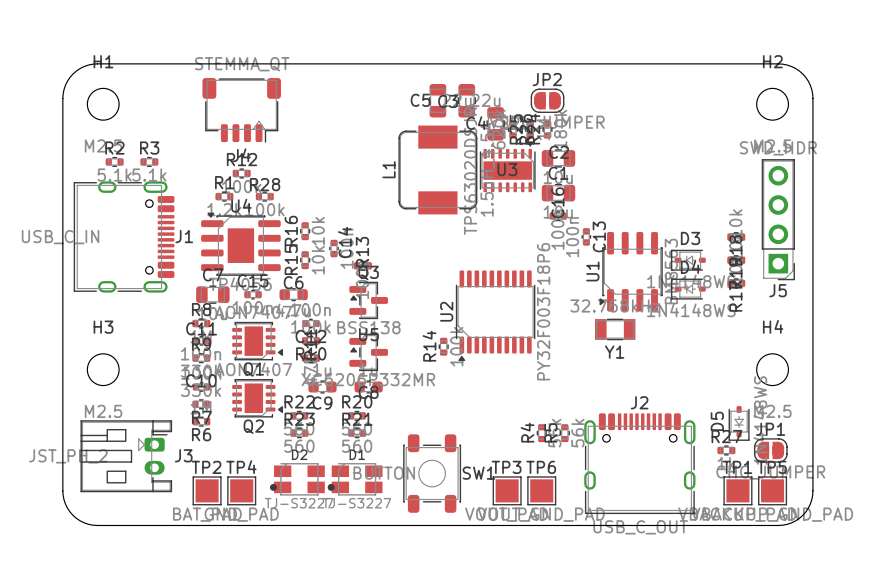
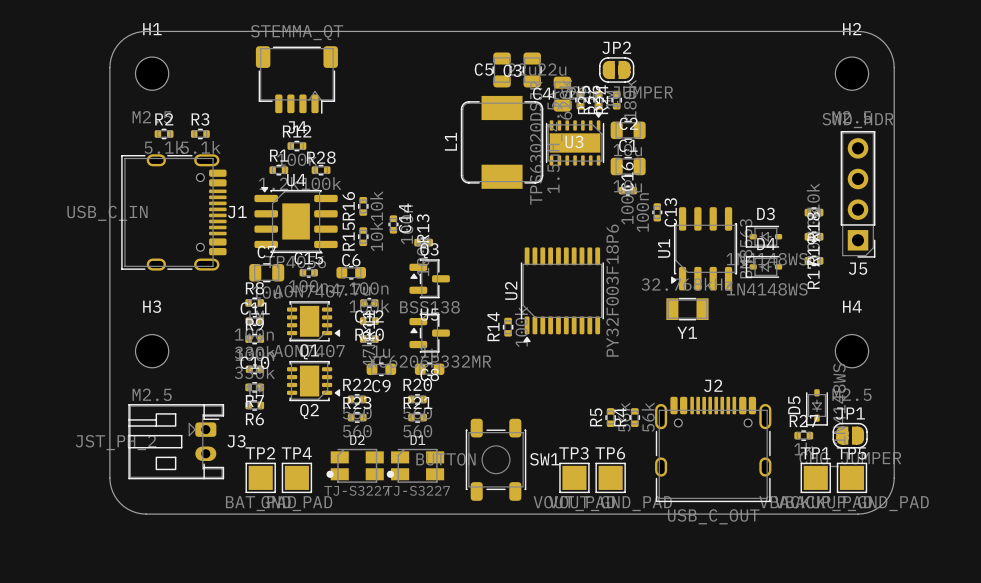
R4 name: R4 (527, 432) -> R5 (596, 417)
R5 name: R5 (550, 432) -> R4 (620, 417)

